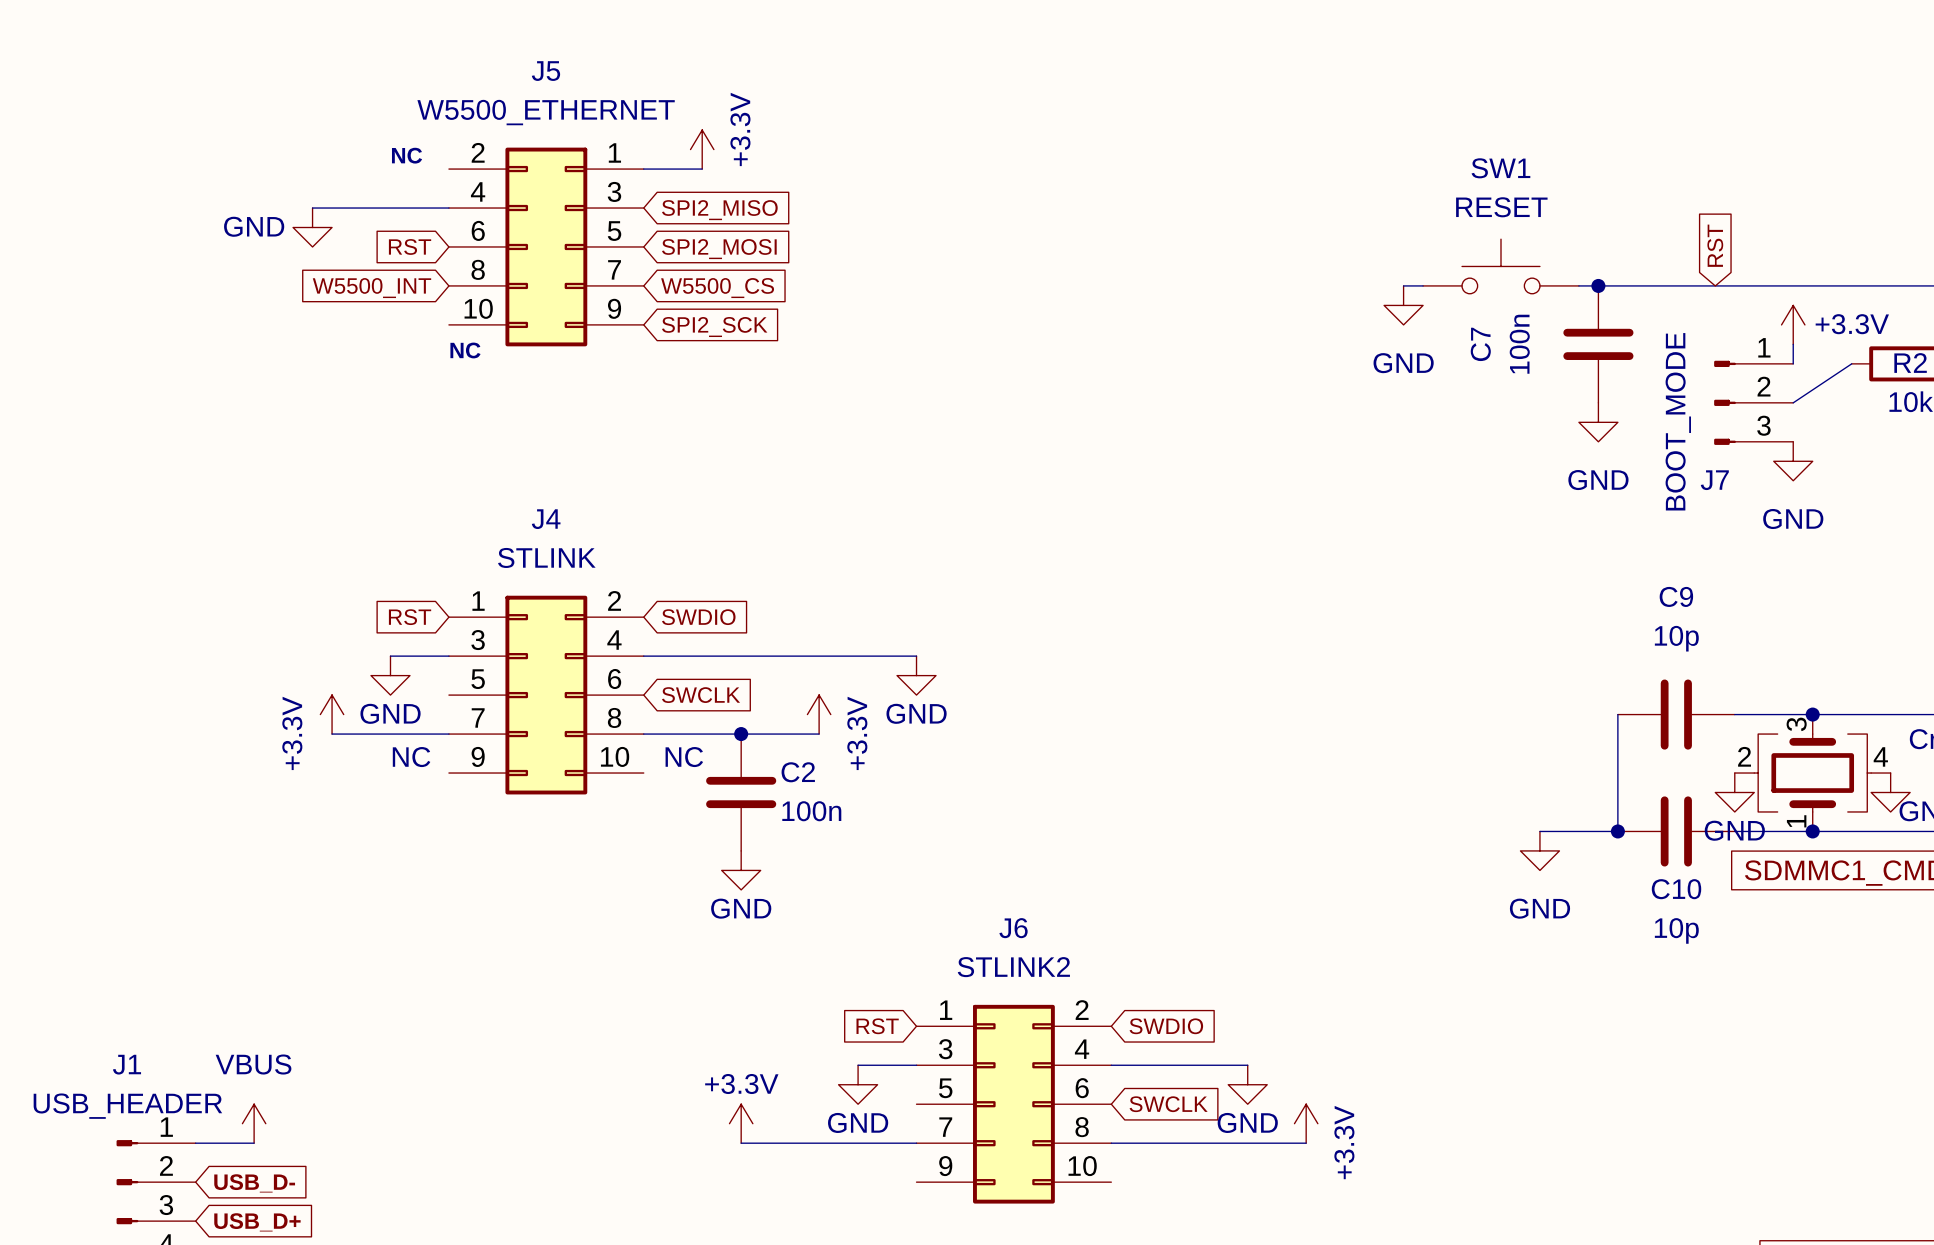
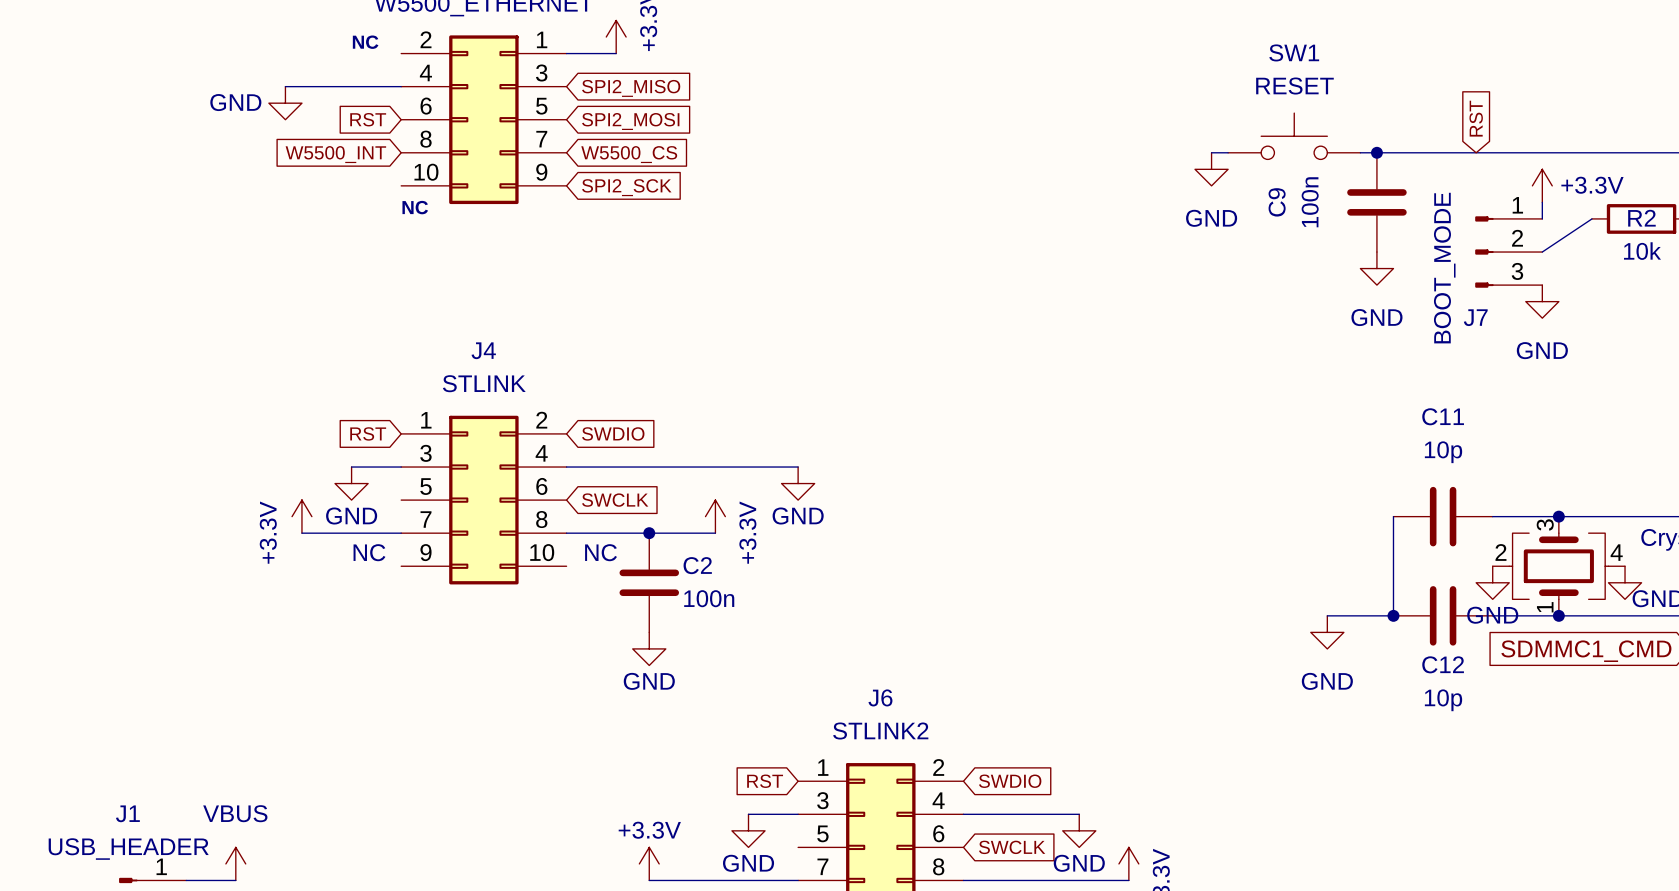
C7 name: C7 (1480, 344) -> C9 (1277, 202)
C9 name: C9 (1676, 596) -> C11 (1443, 416)
C10 name: C10 (1676, 889) -> C12 (1443, 664)

